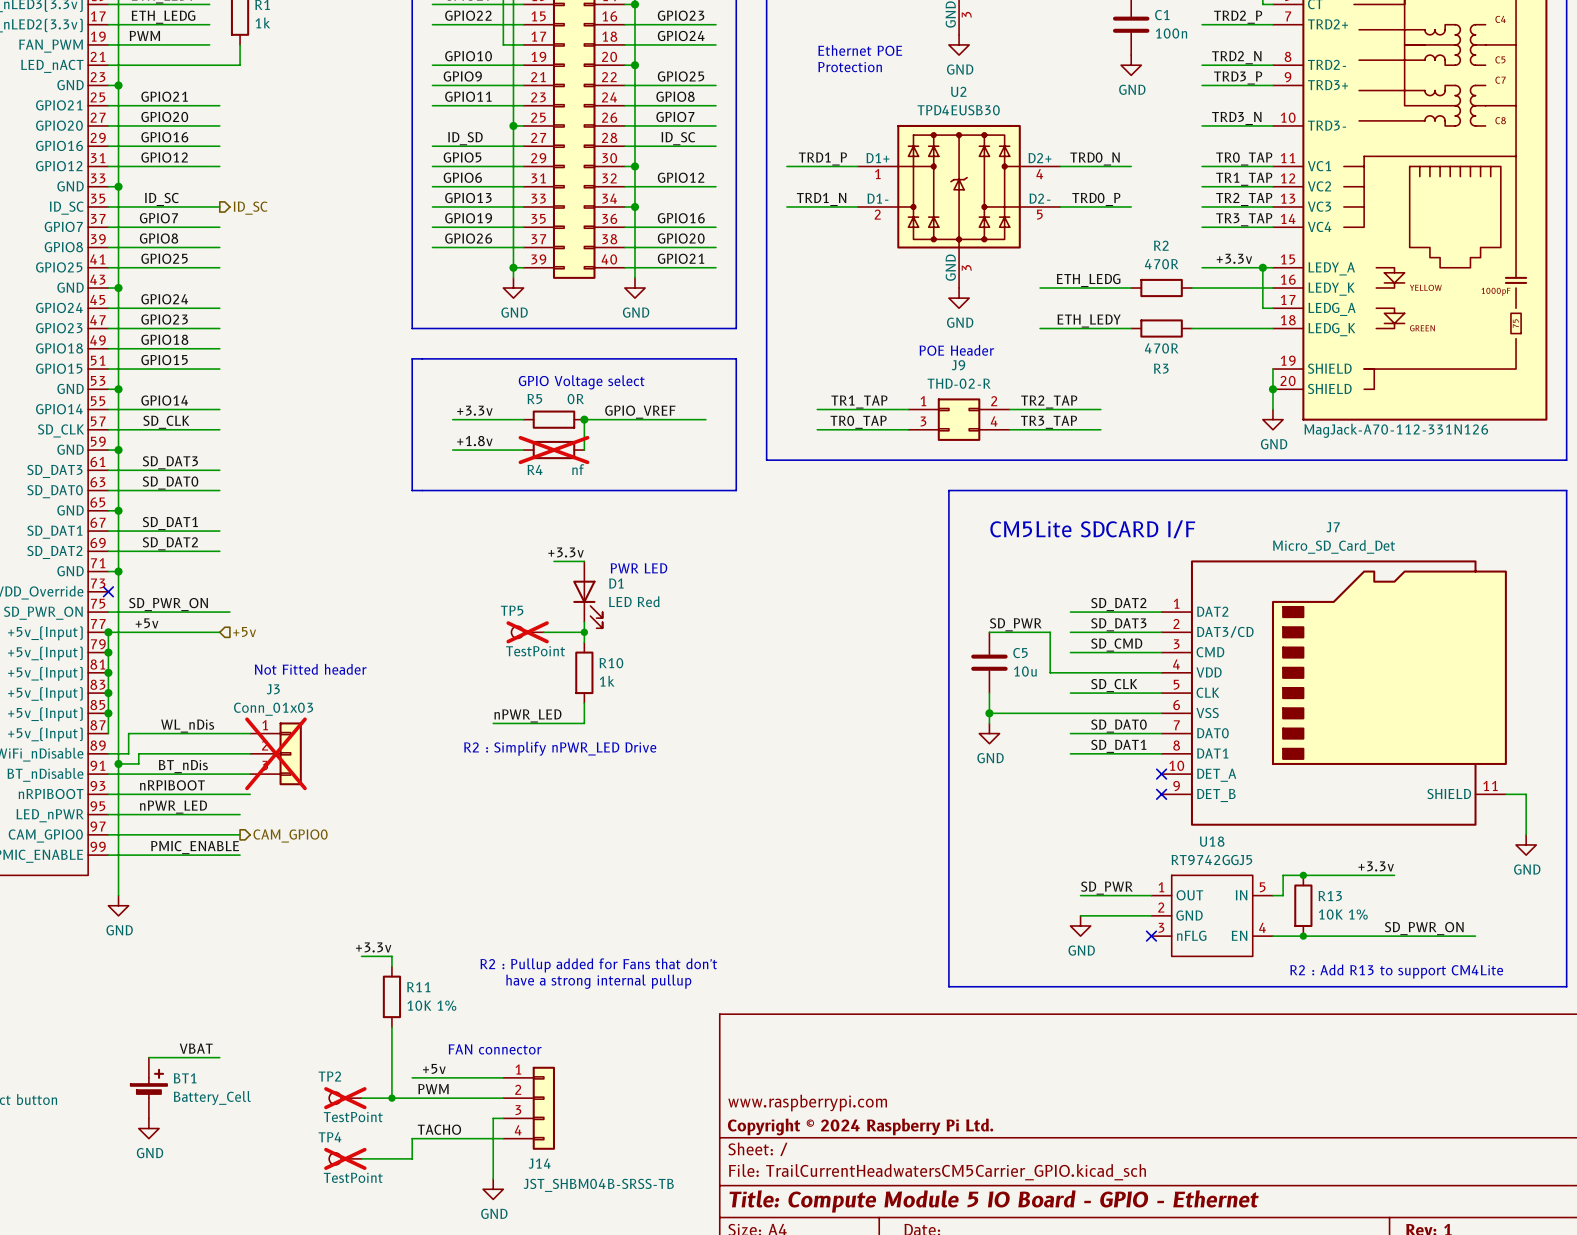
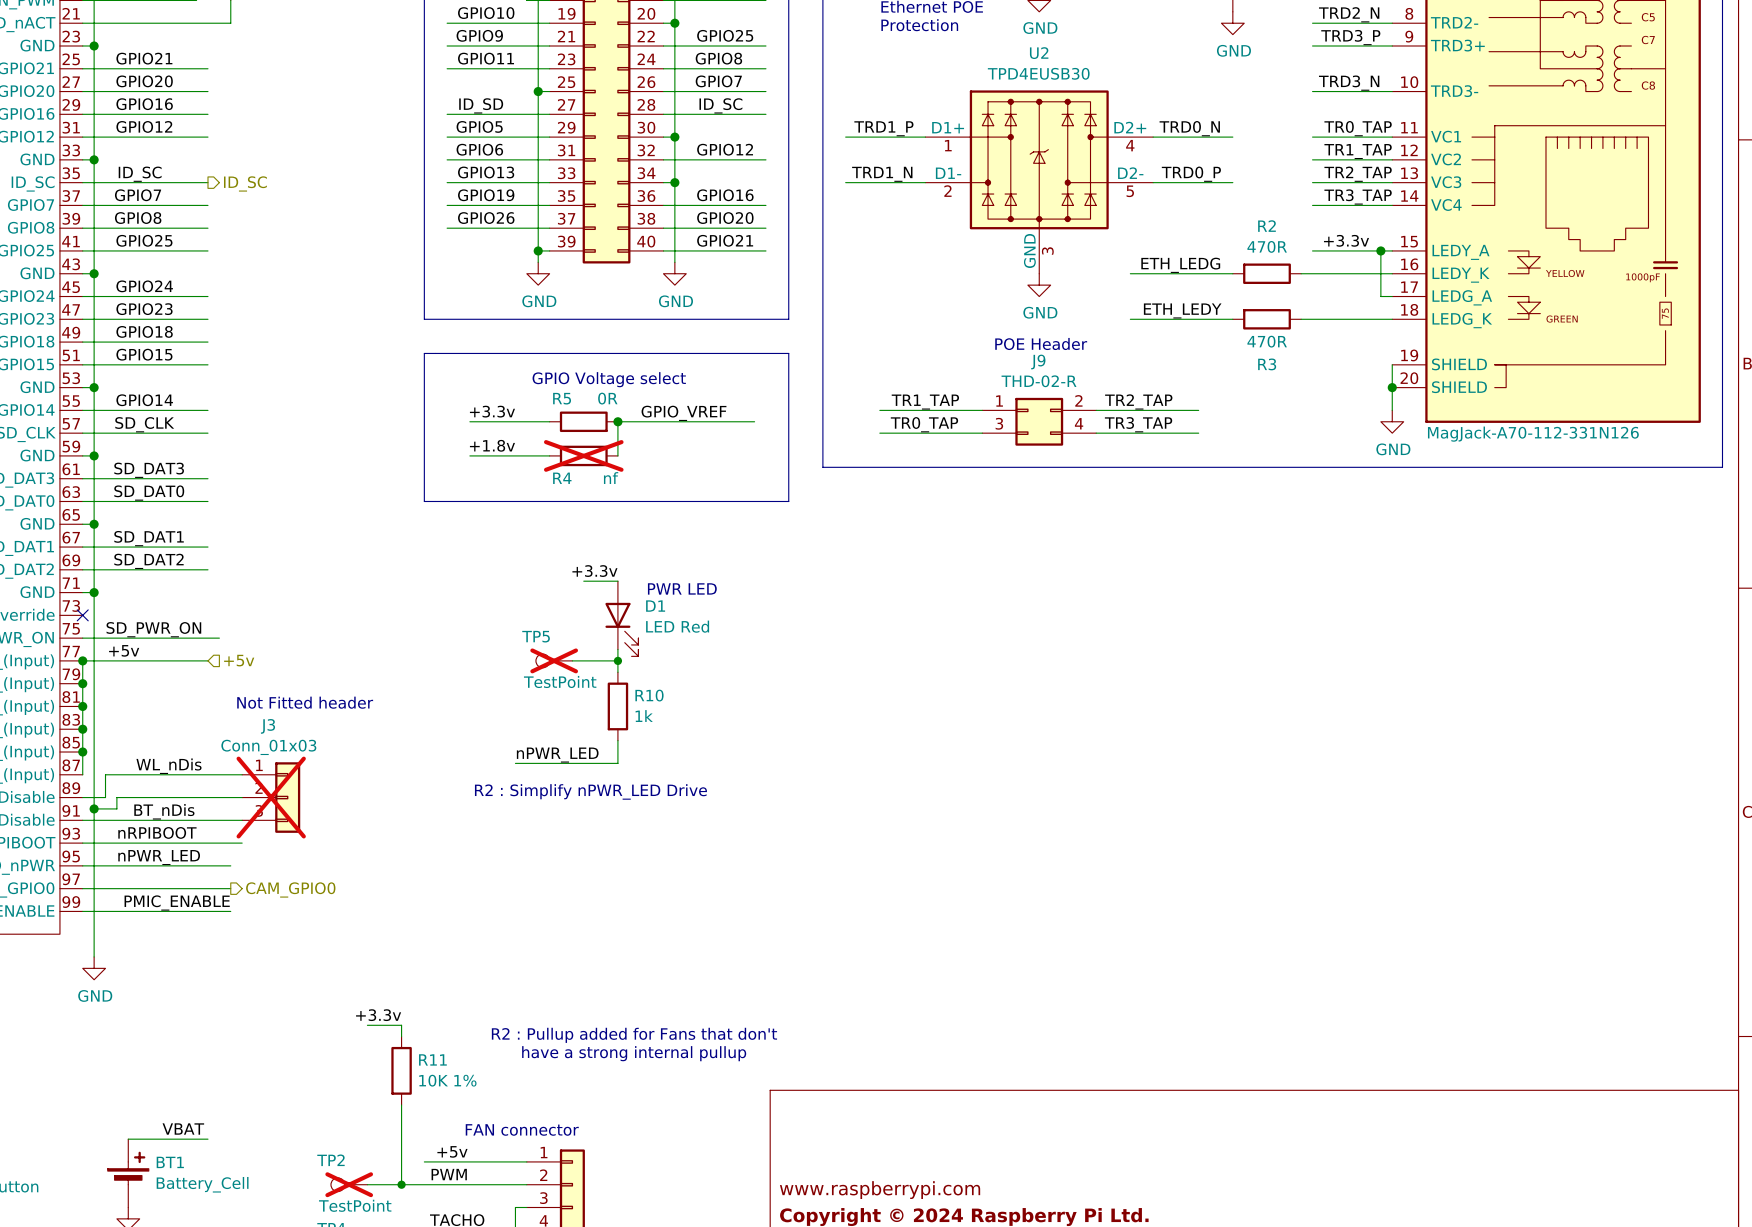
line: (948, 490) (948, 986) (1566, 986) (1566, 490) (948, 490) -> none
text: CM5Lite SDCARD I/F (1092, 529) -> none
label: SD_DAT2 (1118, 604) -> none
wire: (1070, 612) (1161, 612) -> none
label: SD_PWR (1015, 624) -> none
label: SD_DAT3 (1118, 624) -> none
wire: (989, 632) (1050, 632) (1050, 672) (1161, 672) -> none
wire: (1070, 632) (1161, 632) -> none
label: SD_CMD (1116, 645) -> none
wire: (1070, 652) (1161, 652) -> none
C5: 10u (989, 662) -> none
label: SD_CLK (1114, 685) -> none
wire: (989, 693) (989, 723) -> none
wire: (1070, 693) (1161, 693) -> none
J7: Micro_SD_Card_Det (1334, 693) -> none
wire: (989, 713) (1161, 713) -> none
junction: (989, 713) -> none
label: SD_DAT0 (1118, 726) -> none
power symbol: GND (989, 733) -> none
wire: (1070, 733) (1161, 733) -> none
label: SD_DAT1 (1118, 746) -> none
wire: (1070, 753) (1161, 753) -> none
no-connect mark: (1161, 774) -> none
no-connect mark: (1161, 794) -> none
wire: (1505, 794) (1526, 794) (1526, 834) -> none
power symbol: GND (1526, 844) -> none
label: +3.3v (1376, 866) -> none
junction: (1303, 875) -> none
wire: (1394, 875) (1283, 875) (1283, 895) (1272, 895) -> none
label: SD_PWR (1106, 888) -> none
wire: (1080, 895) (1151, 895) -> none
R13: 10K 1% (1303, 905) -> none
wire: (1080, 915) (1151, 915) -> none
U18: RT9742GGJ5 (1212, 915) -> none
power symbol: GND (1080, 925) -> none
label: SD_PWR_ON (1424, 928) -> none
no-connect mark: (1151, 936) -> none
wire: (1272, 936) (1475, 936) -> none
junction: (1303, 936) -> none
text: R2 : Add R13 to support CM4Lite (1396, 971) -> none

